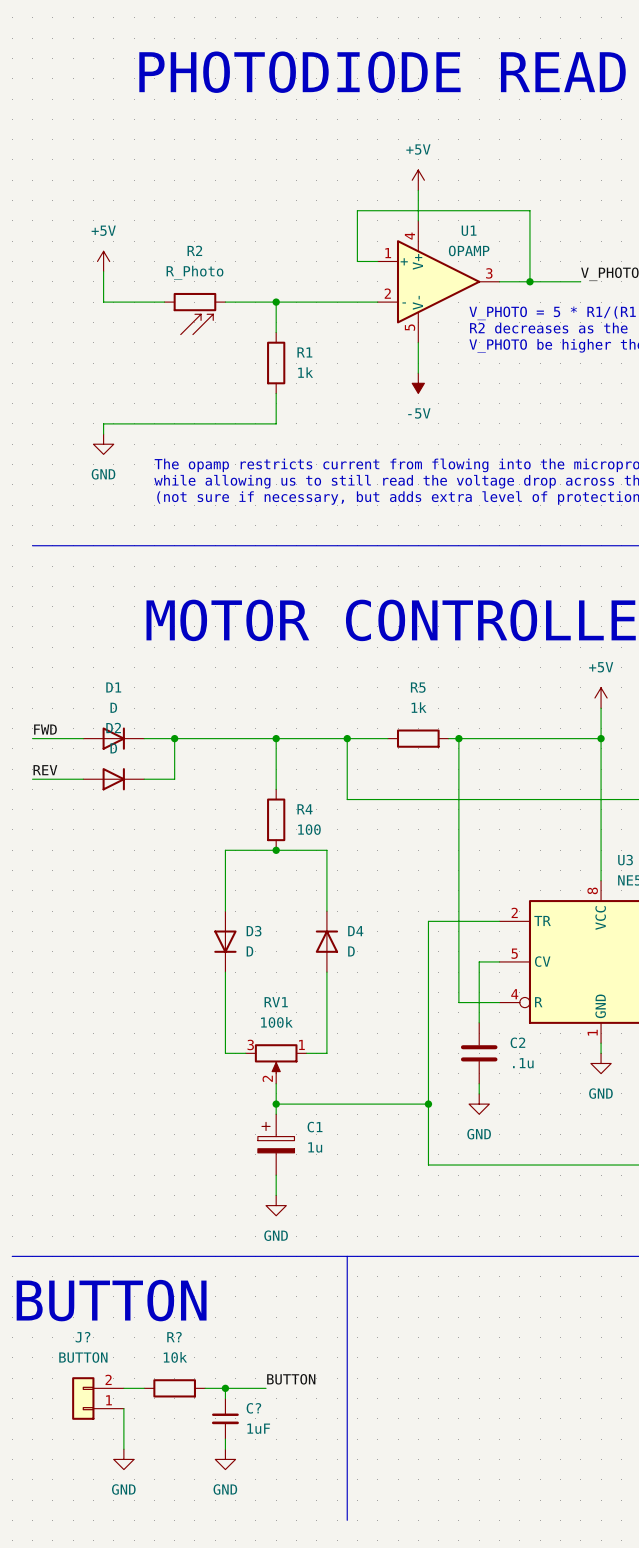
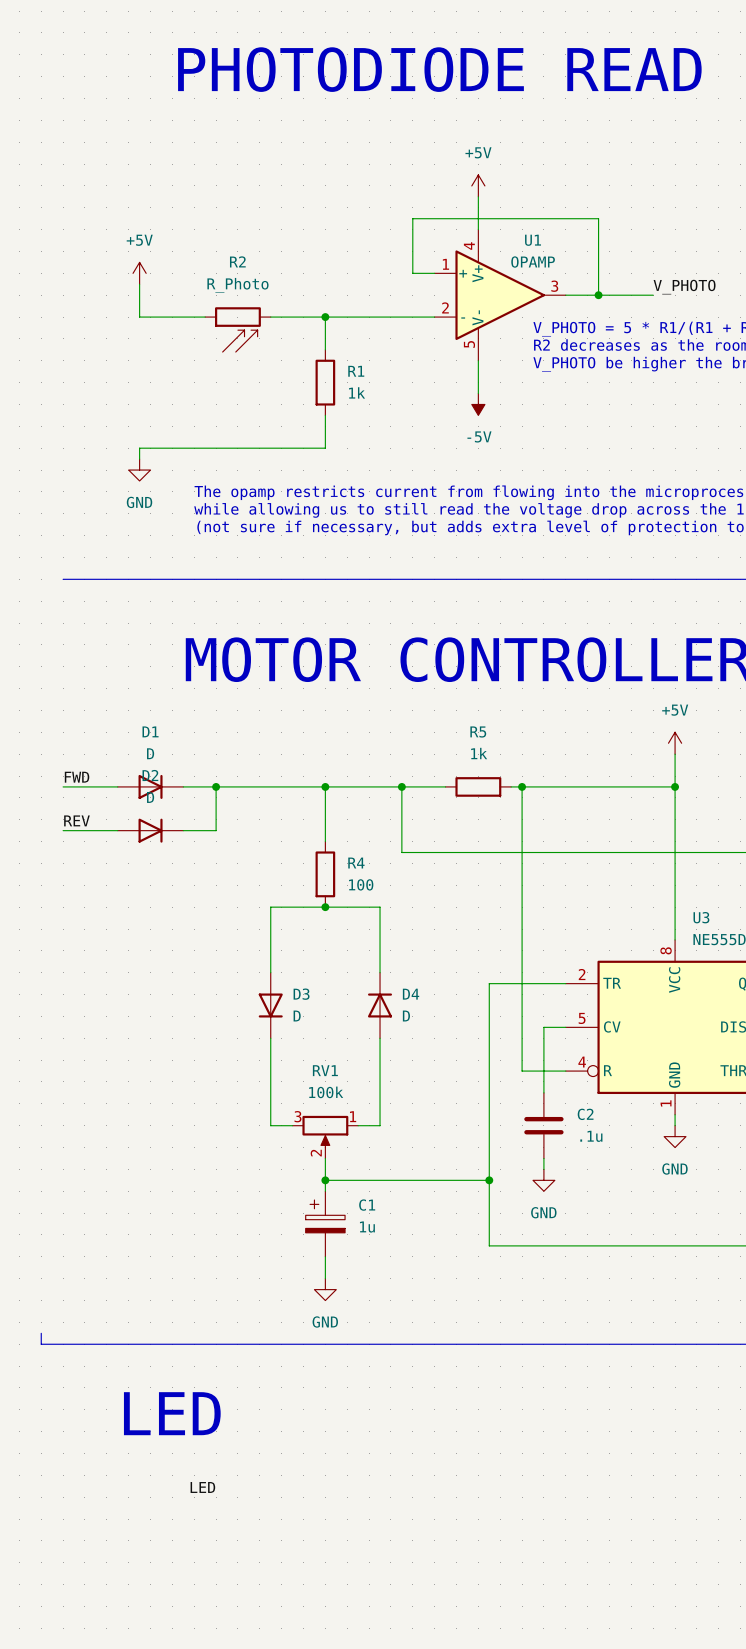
line: none -> (41, 1333) (41, 1344)
line: (347, 1256) (347, 1520) -> none
text: BUTTON (111, 1300) -> none
text: none -> LED (172, 1413)
label: BUTTON (291, 1379) -> none
wire: (123, 1388) (144, 1388) -> none
R?: 10k (174, 1388) -> none
wire: (205, 1388) (266, 1388) -> none
wire: (225, 1388) (225, 1398) -> none
junction: (225, 1388) -> none
label: none -> LED (202, 1487)
J?: BUTTON (98, 1398) -> none
wire: (123, 1408) (123, 1449) -> none
C?: 1uF (225, 1418) -> none
wire: (225, 1439) (225, 1449) -> none
power symbol: GND (123, 1459) -> none
power symbol: GND (225, 1459) -> none

